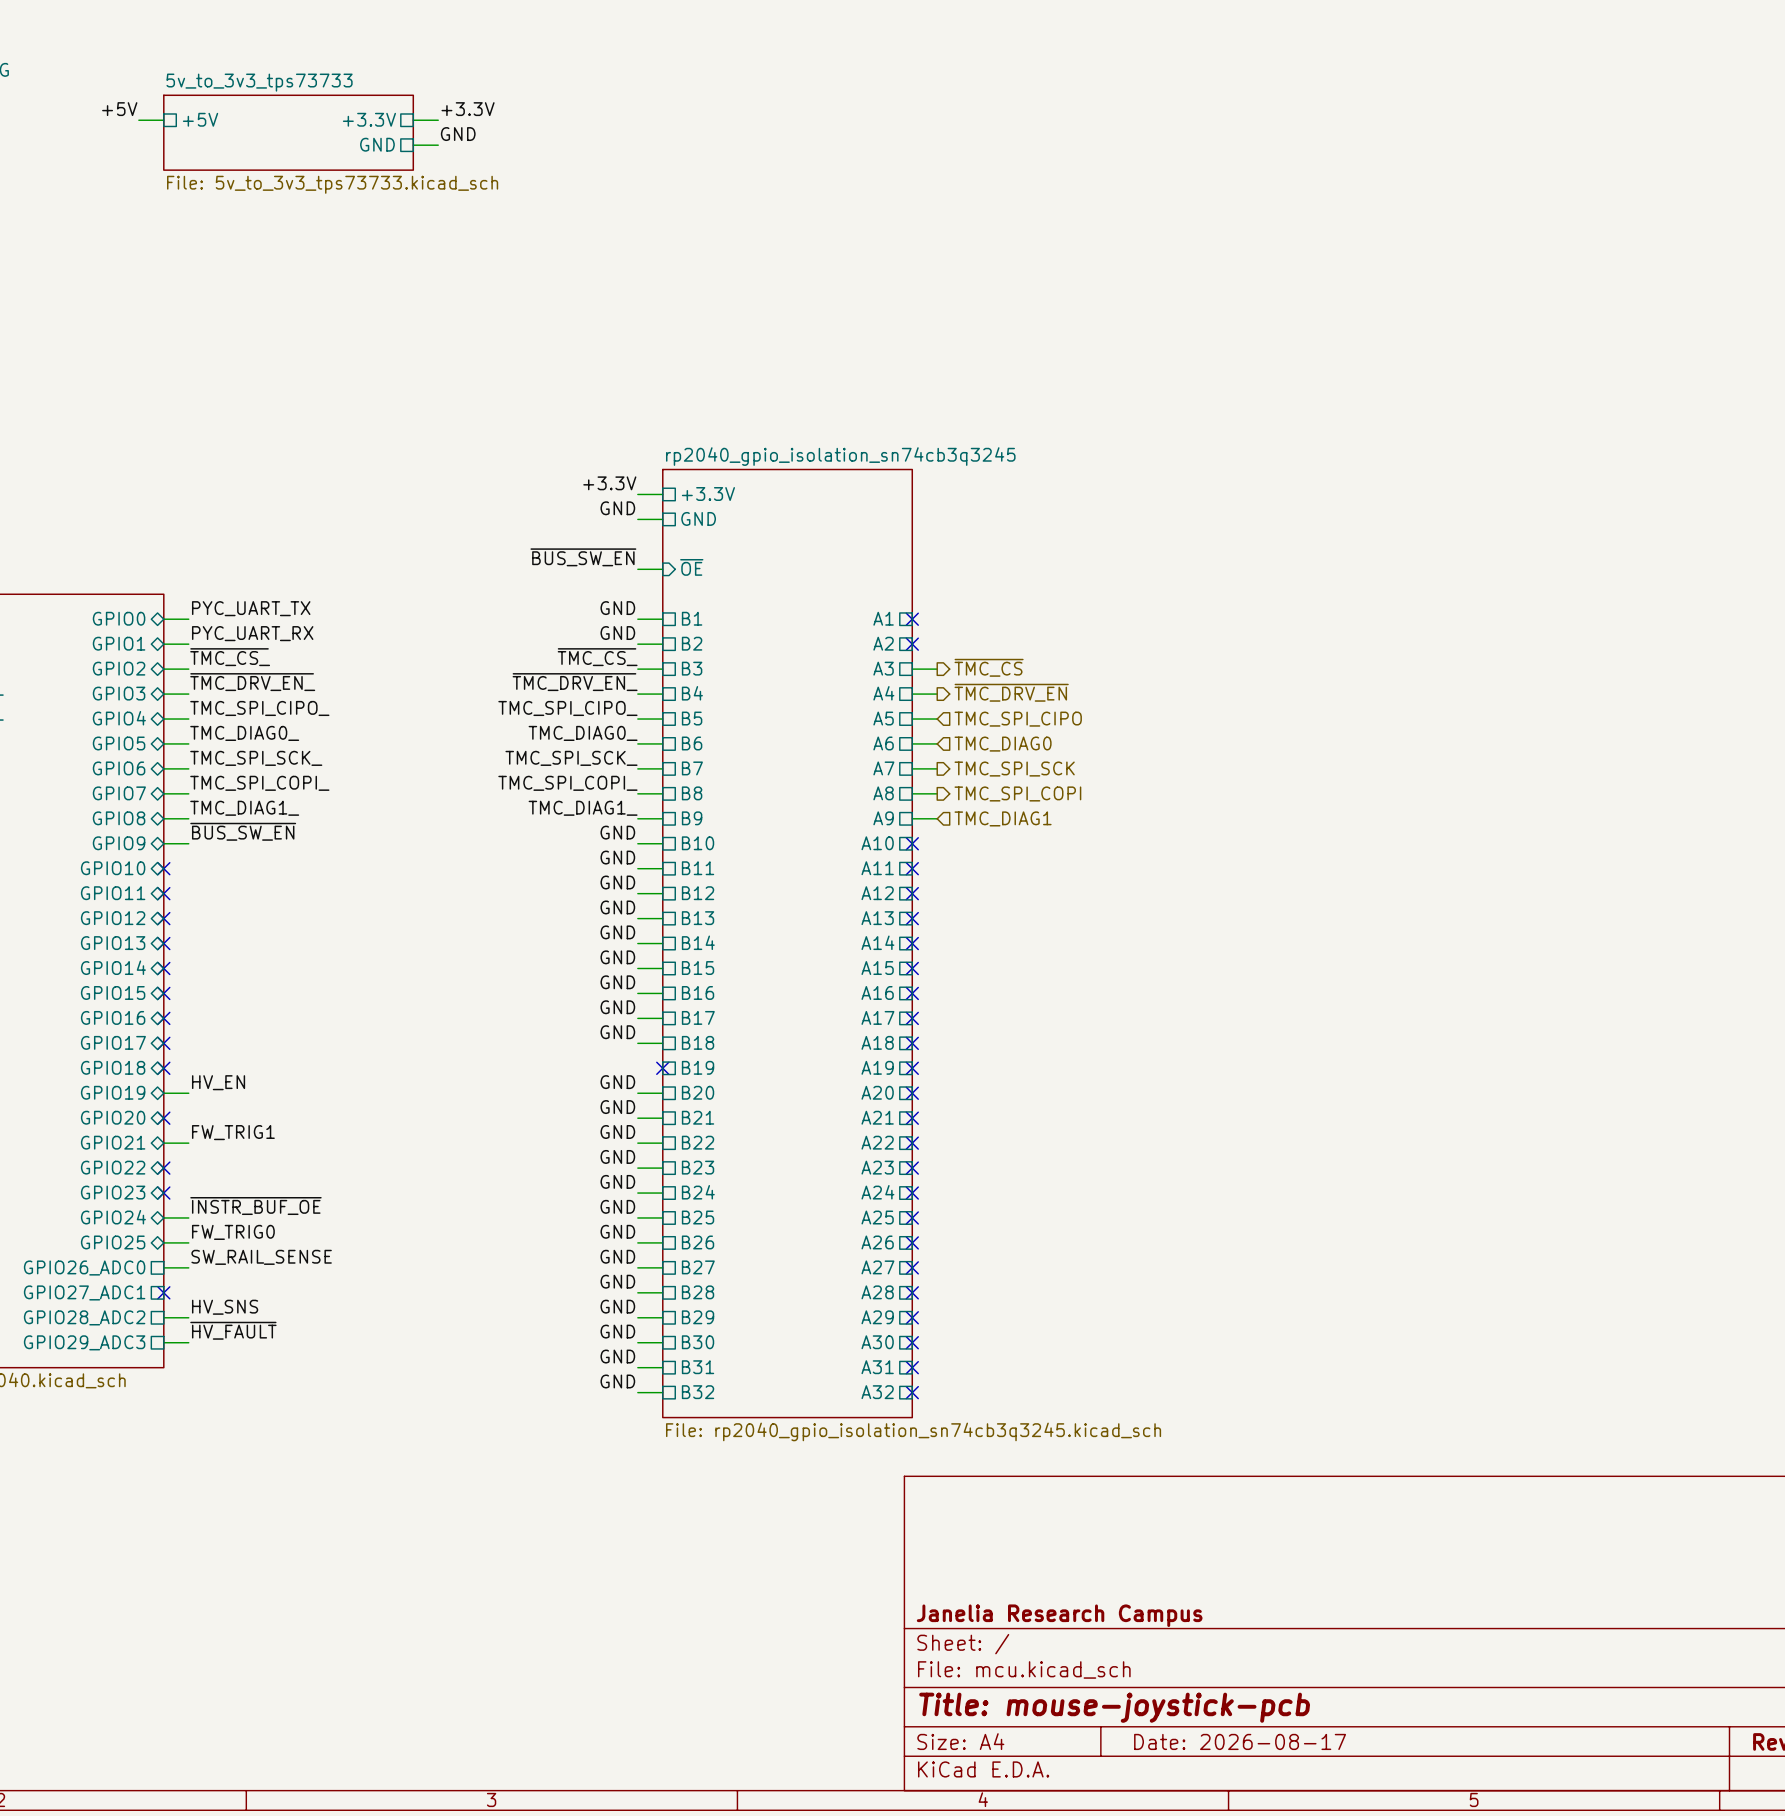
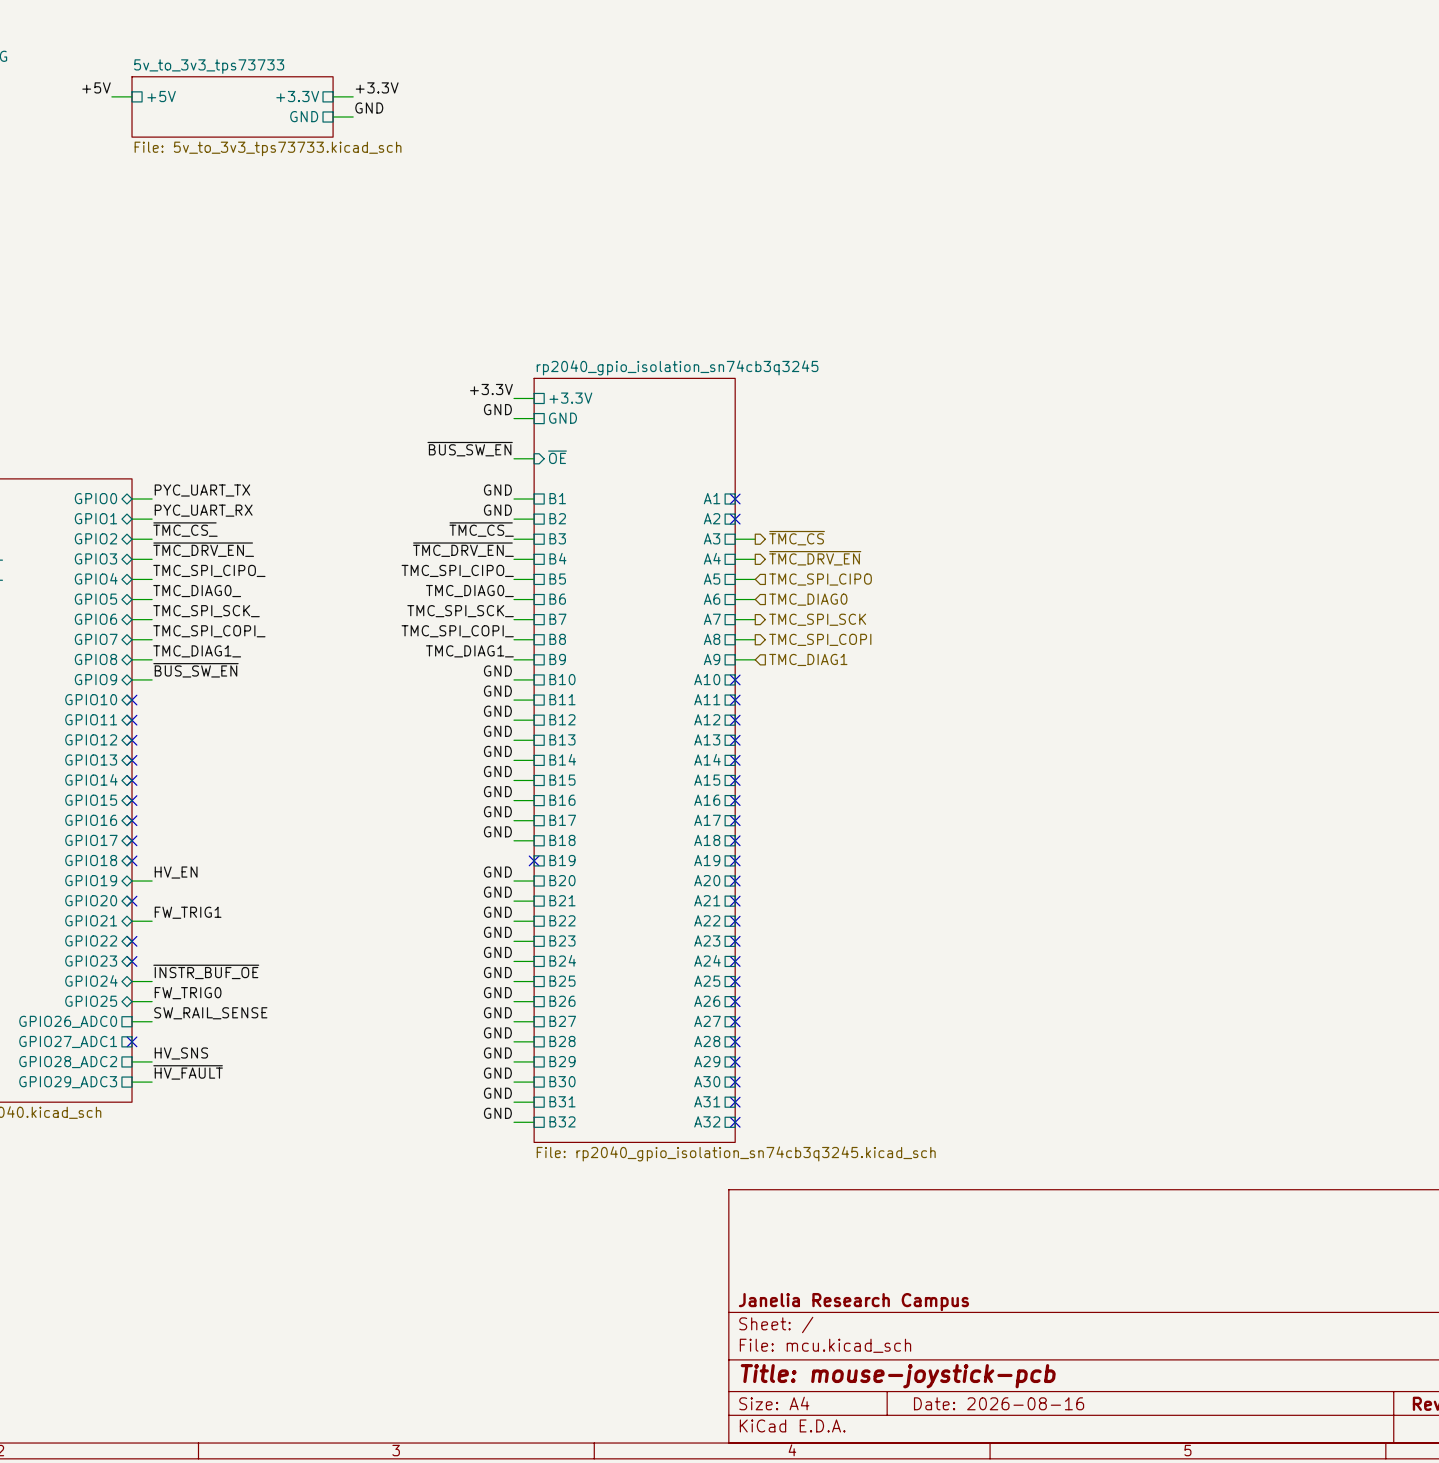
title block: Date: 2026-08-17 (1240, 1741) -> Date: 2026-08-16 (999, 1403)

